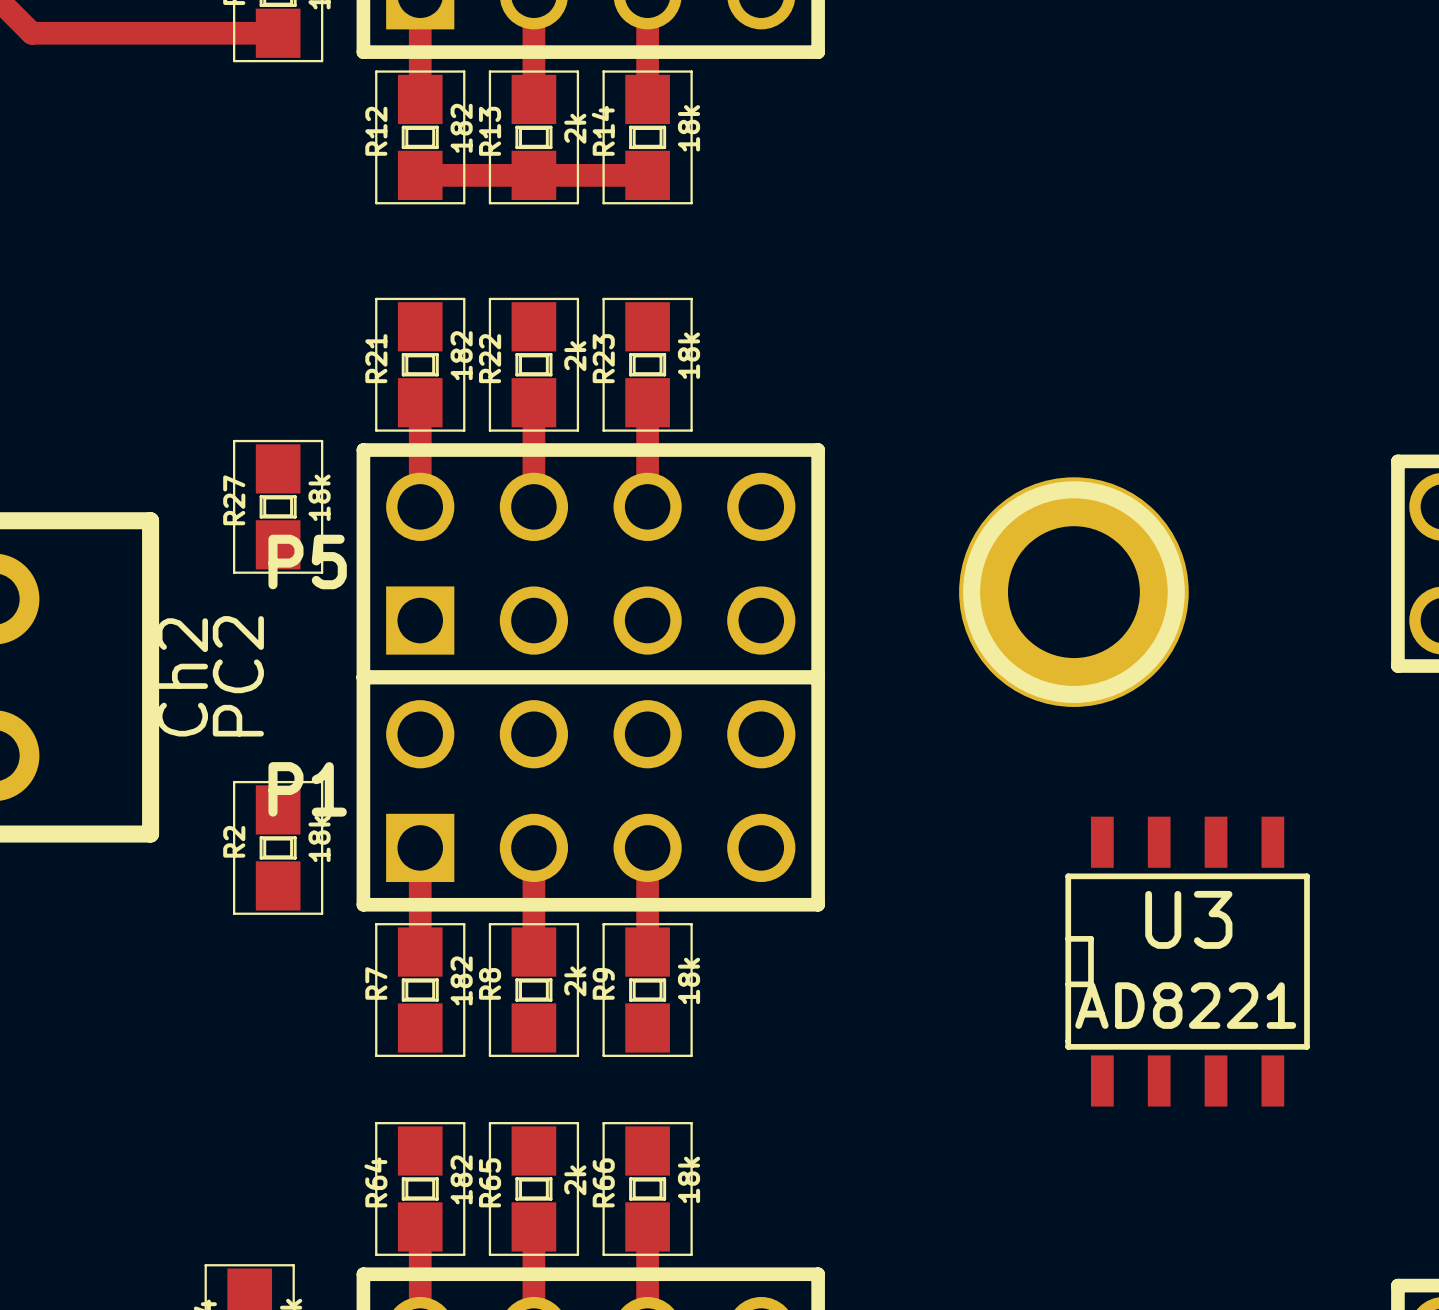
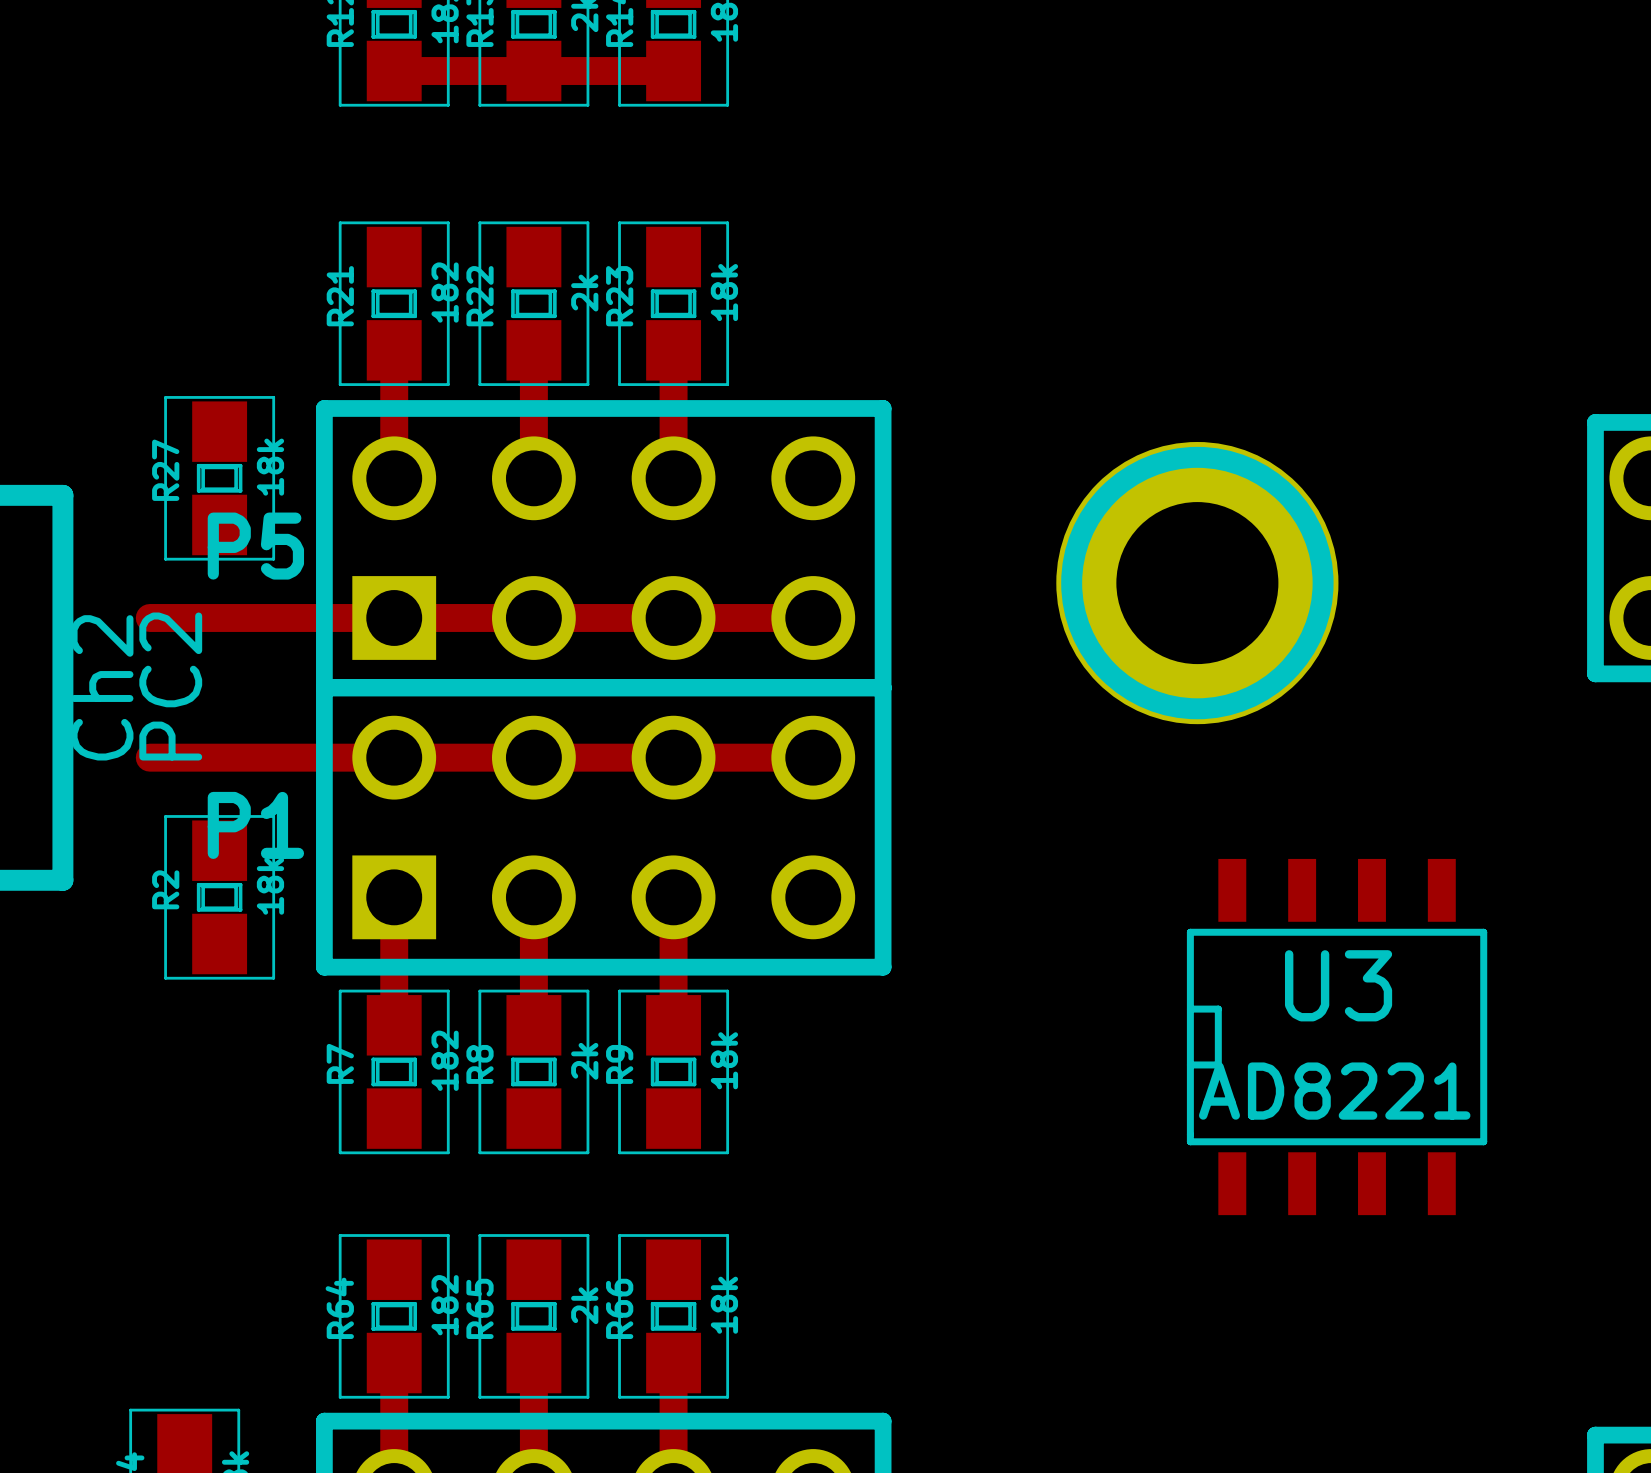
top track: none -> (149, 617) (813, 617)
top track: none -> (149, 757) (813, 757)

